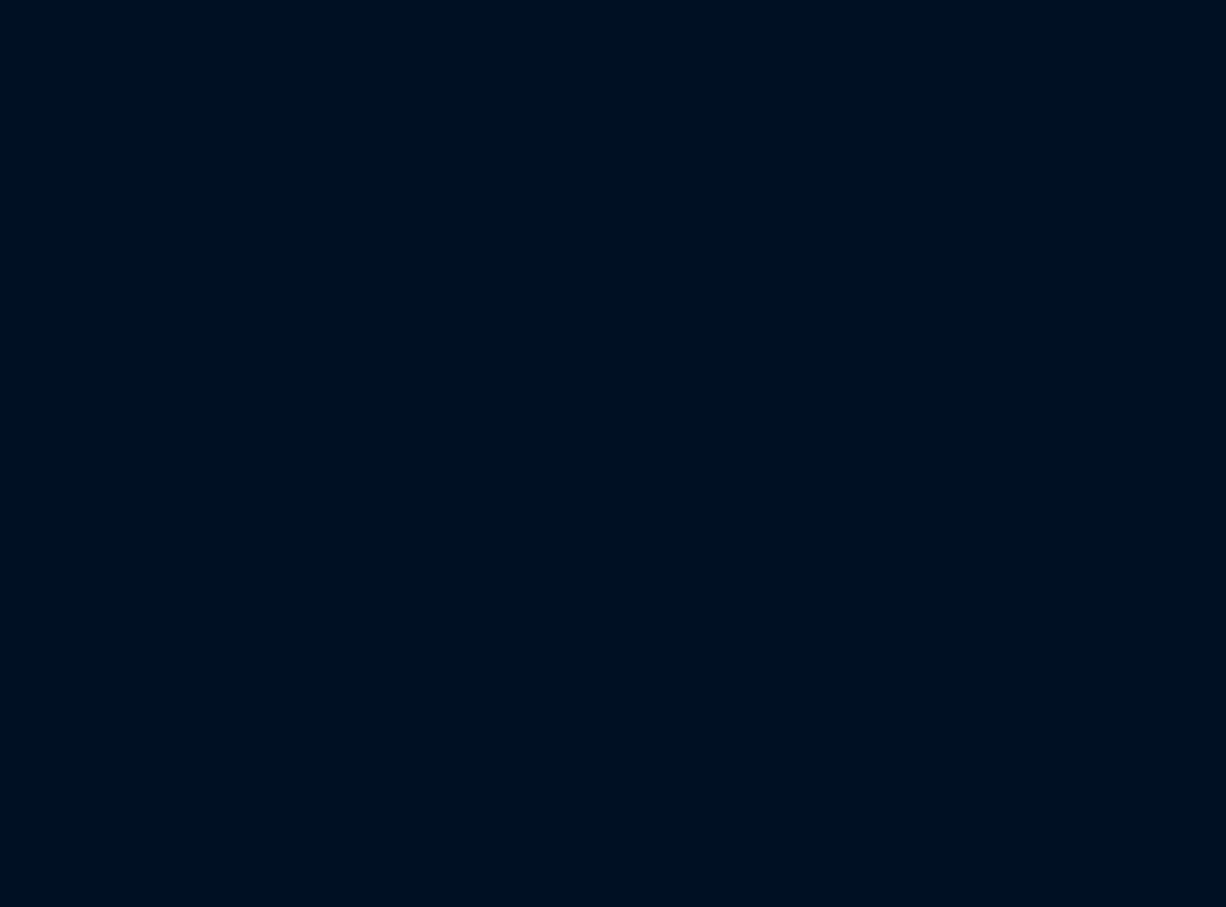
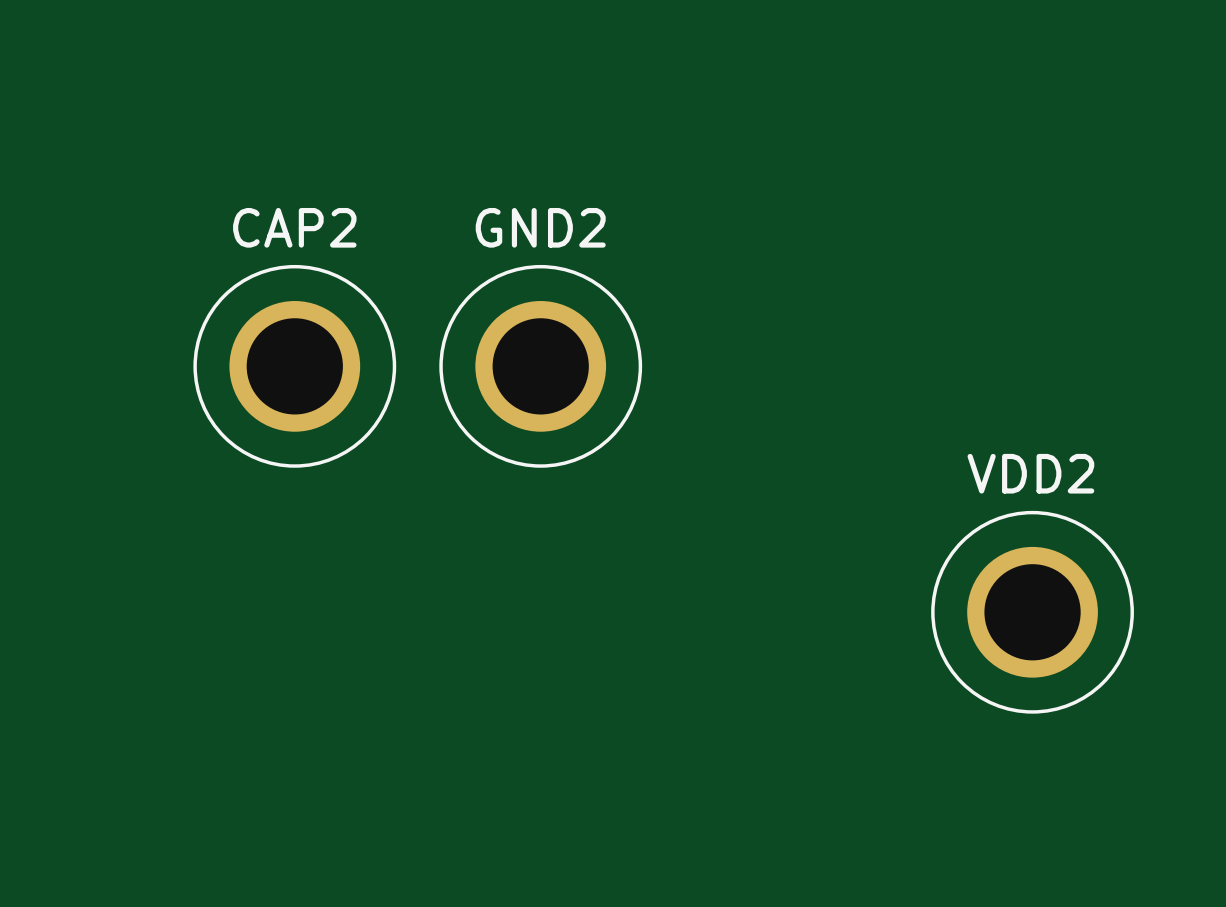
CAP2: none -> (294, 366)
GND2: none -> (540, 366)
VDD2: none -> (1032, 612)

